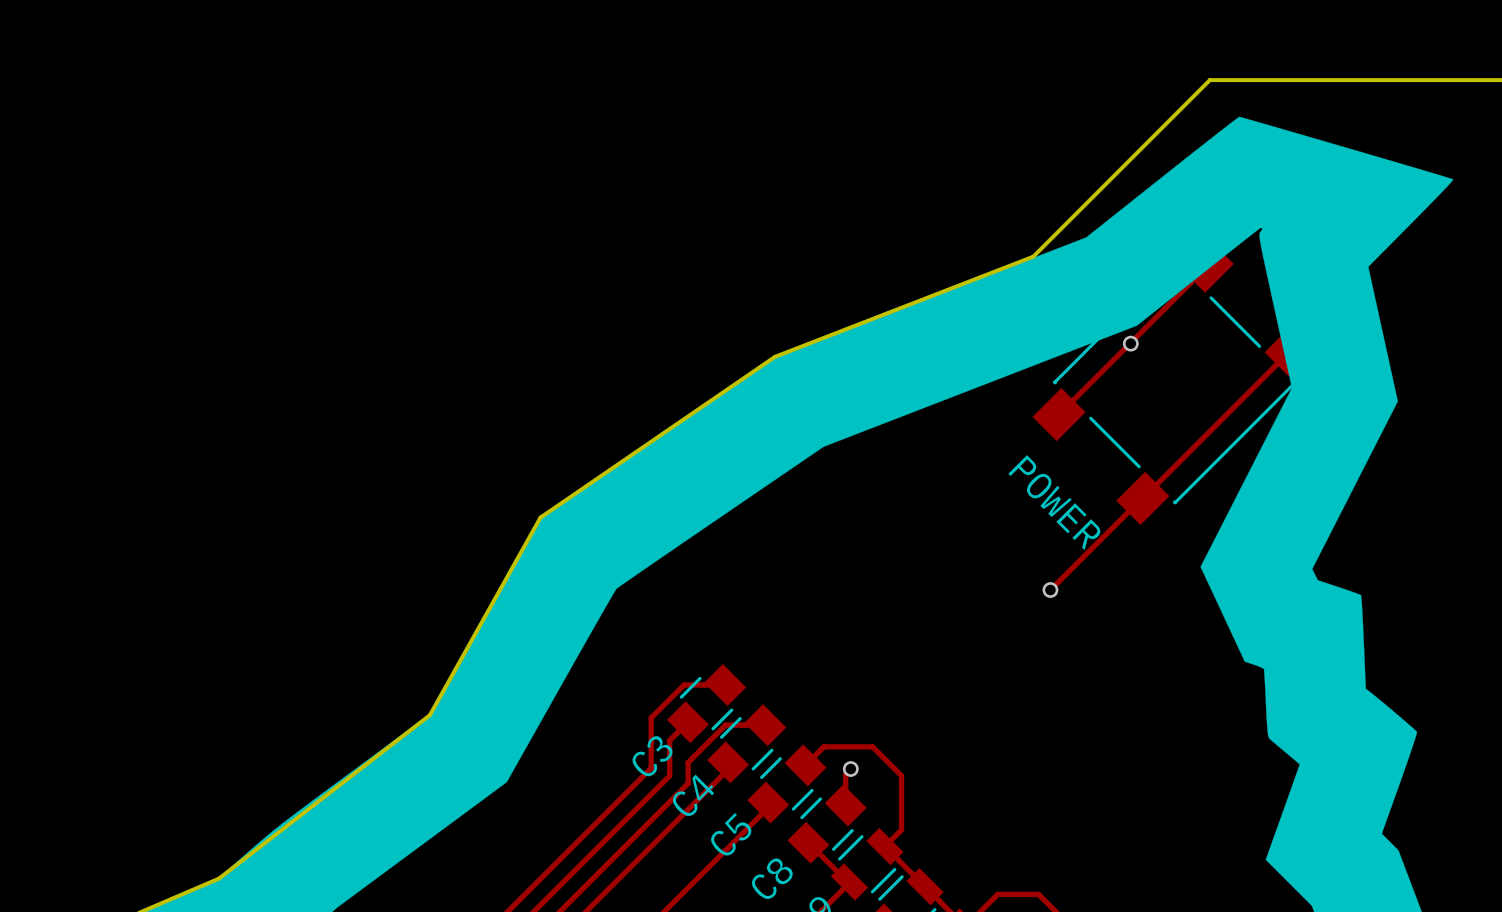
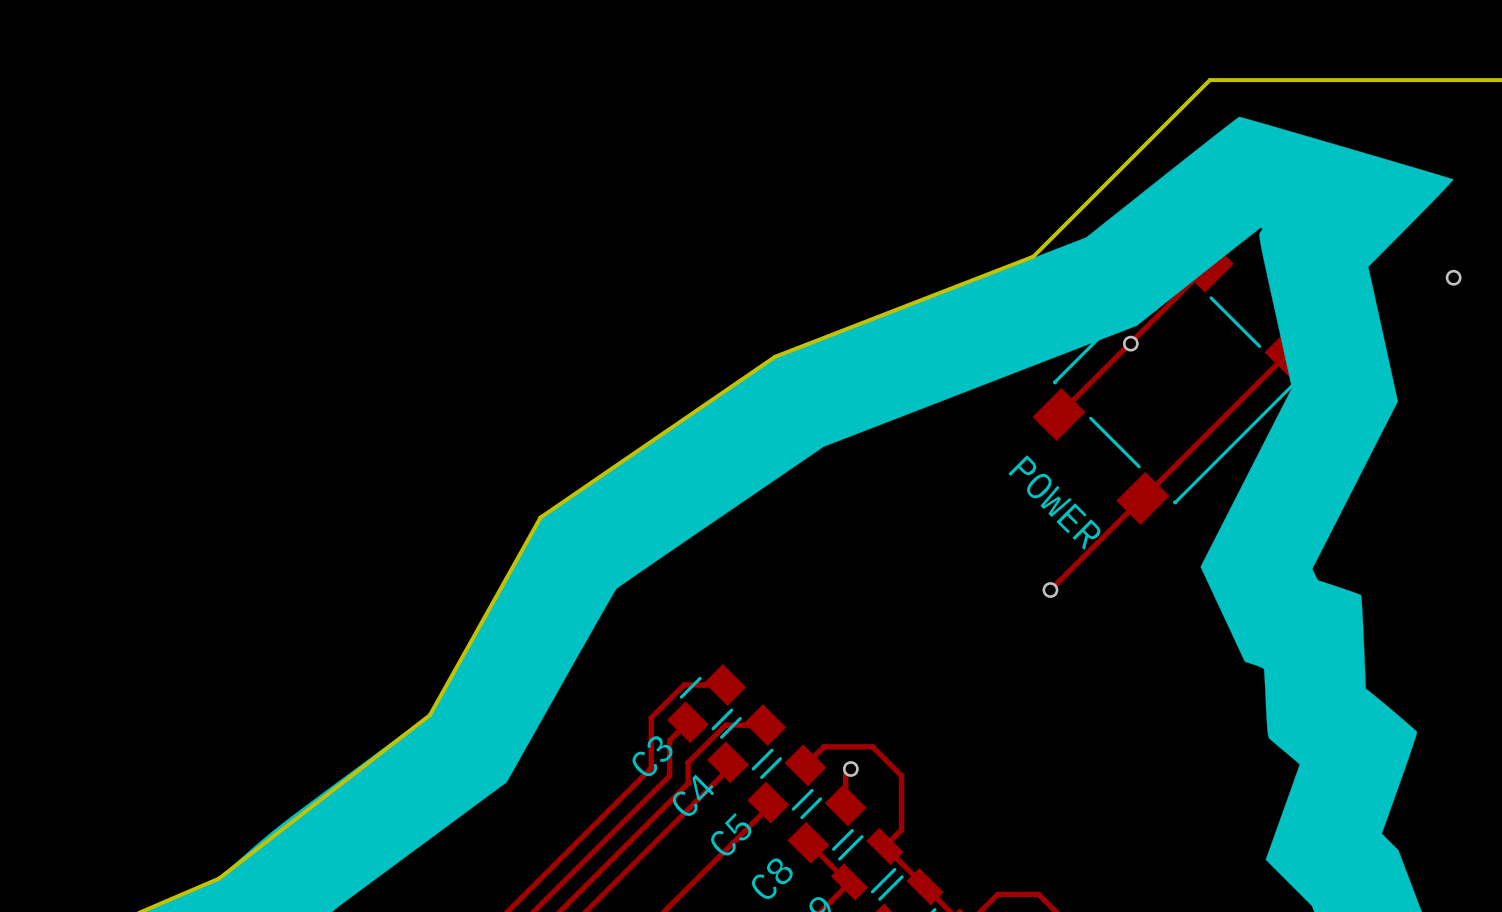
via: none -> (1453, 277)

